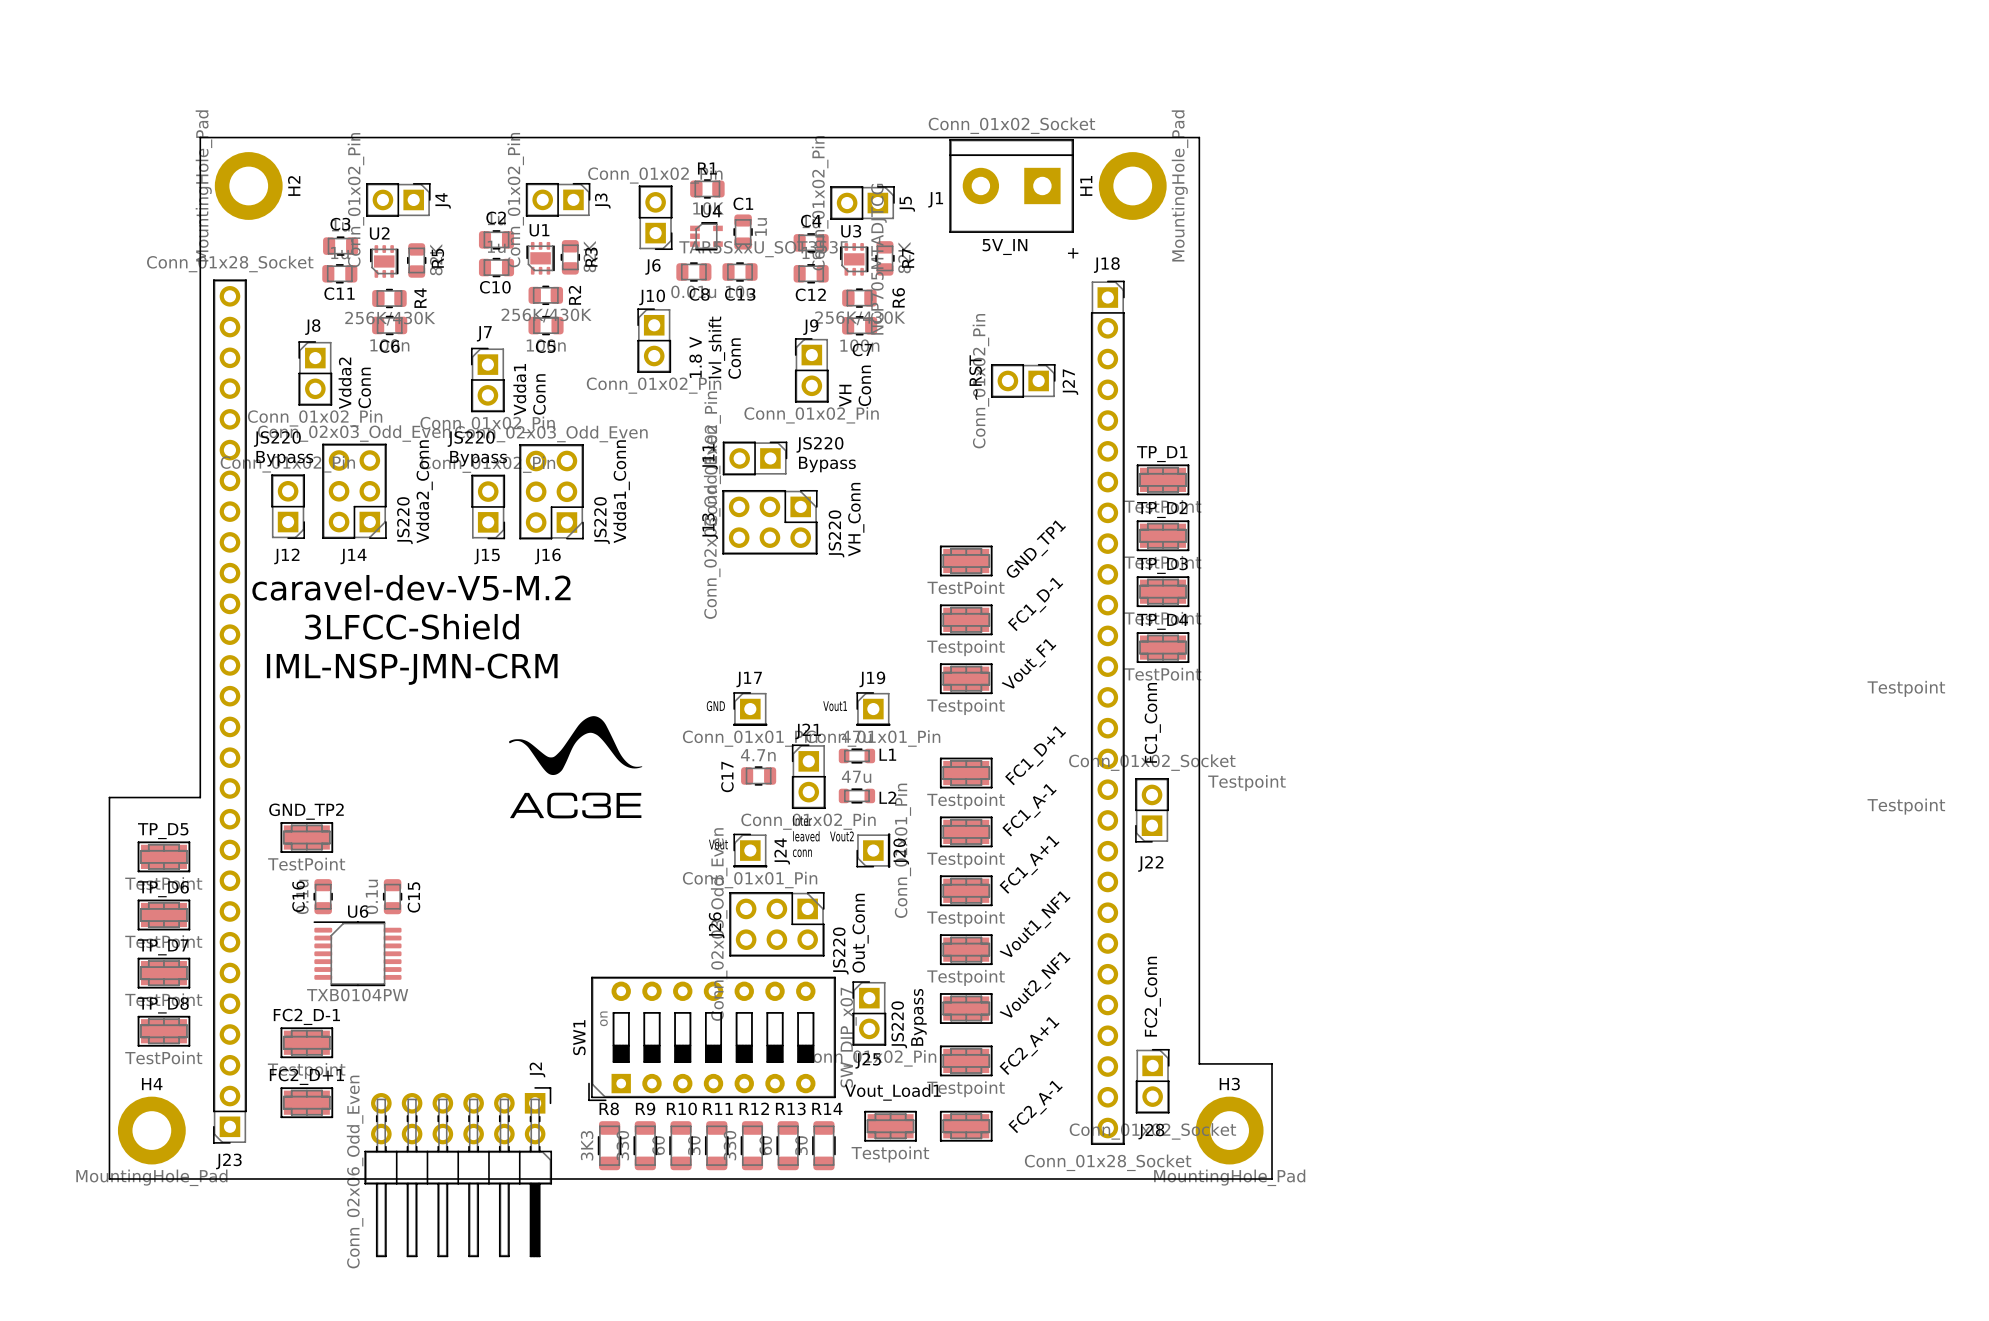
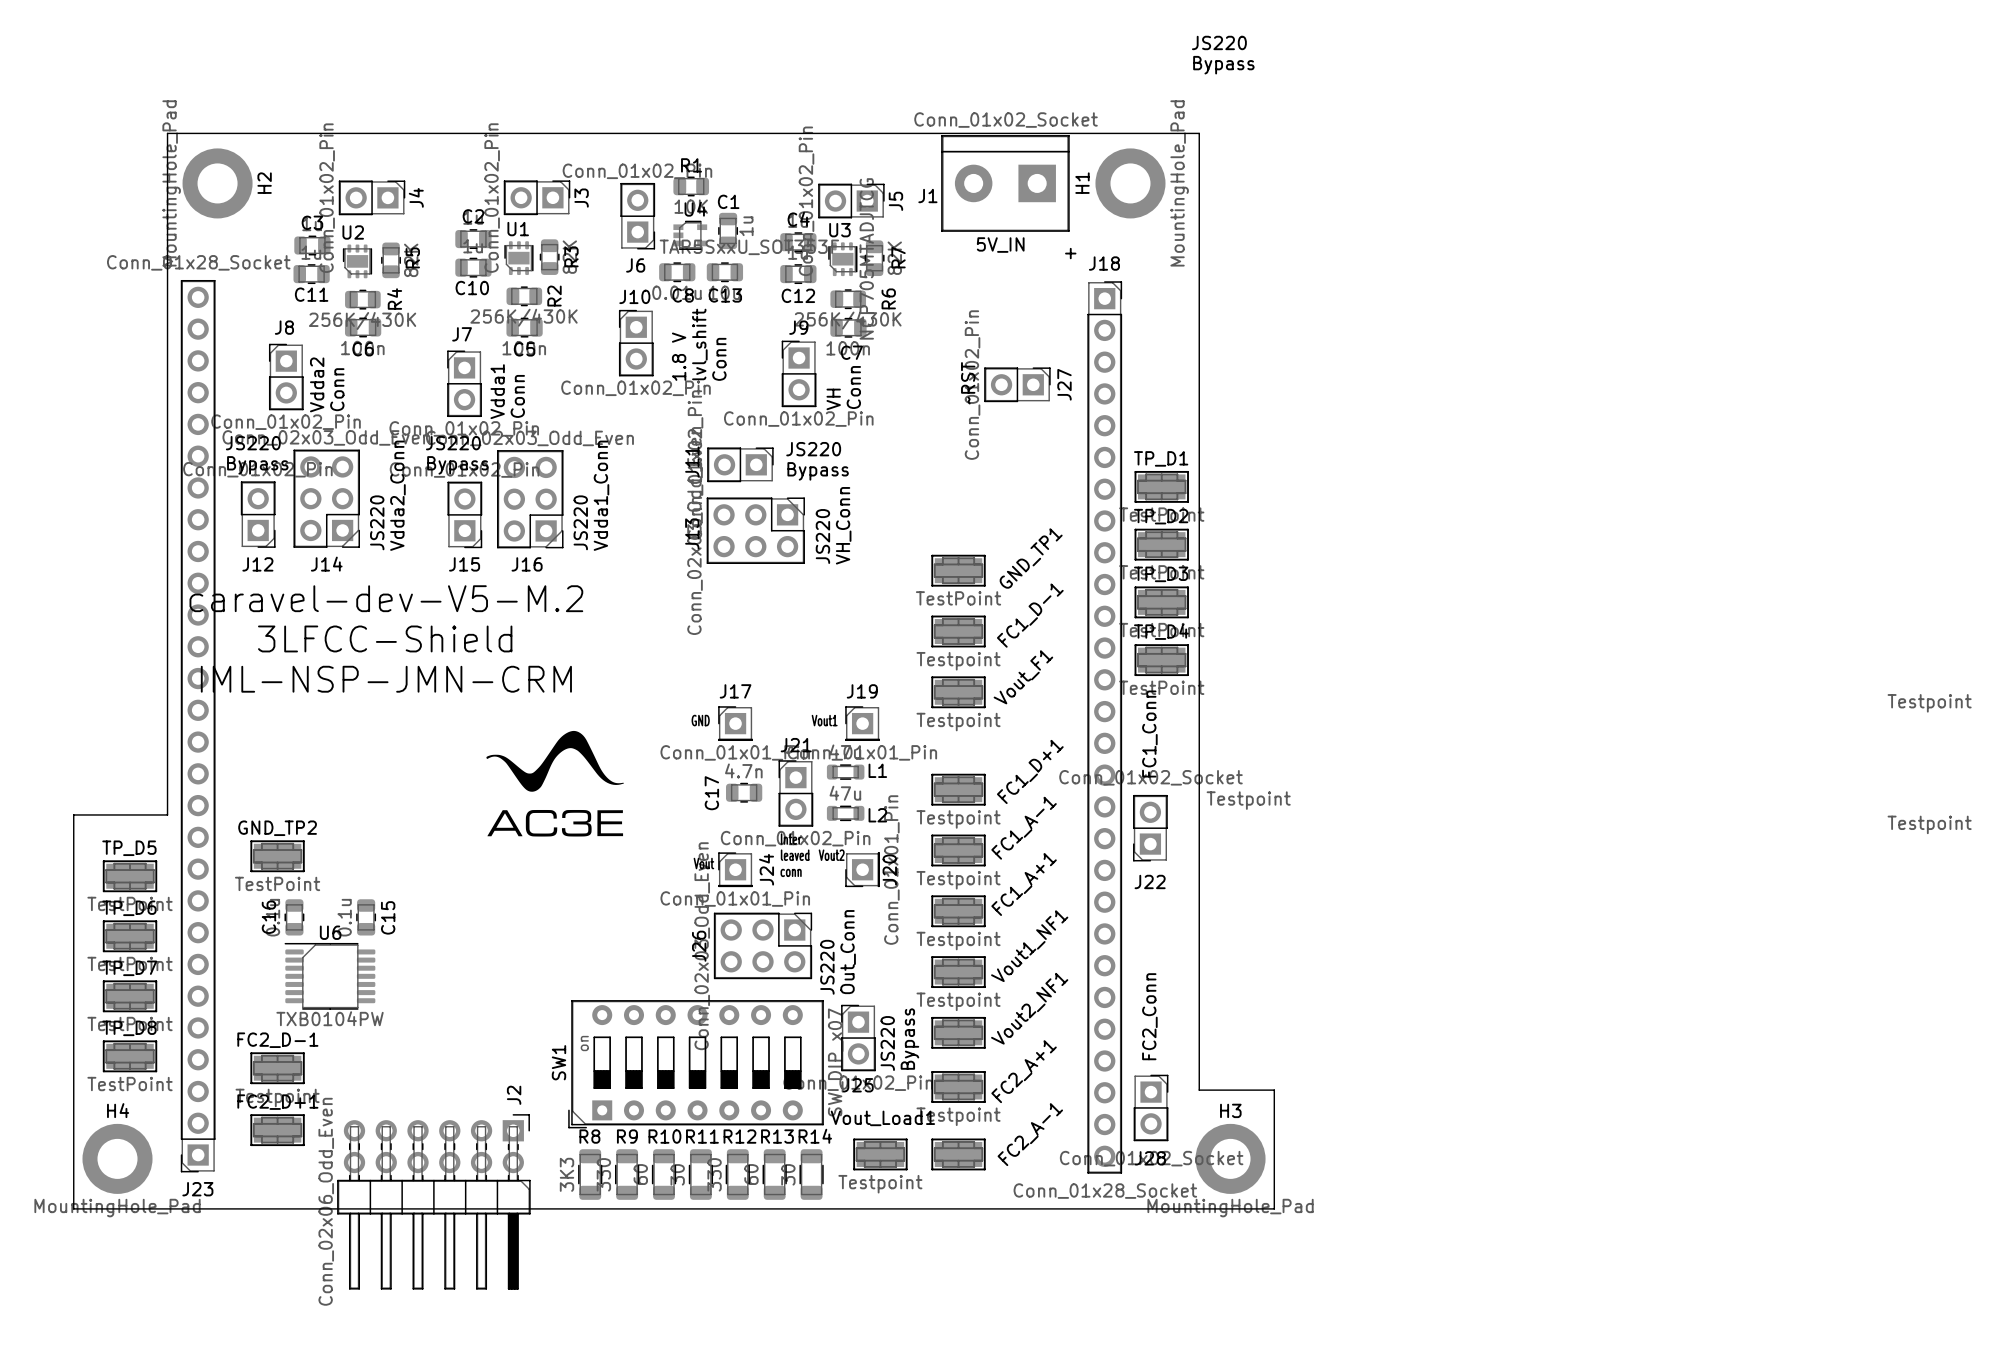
text: none -> JS220 (1219, 42)
text: none -> Bypass (1223, 65)

